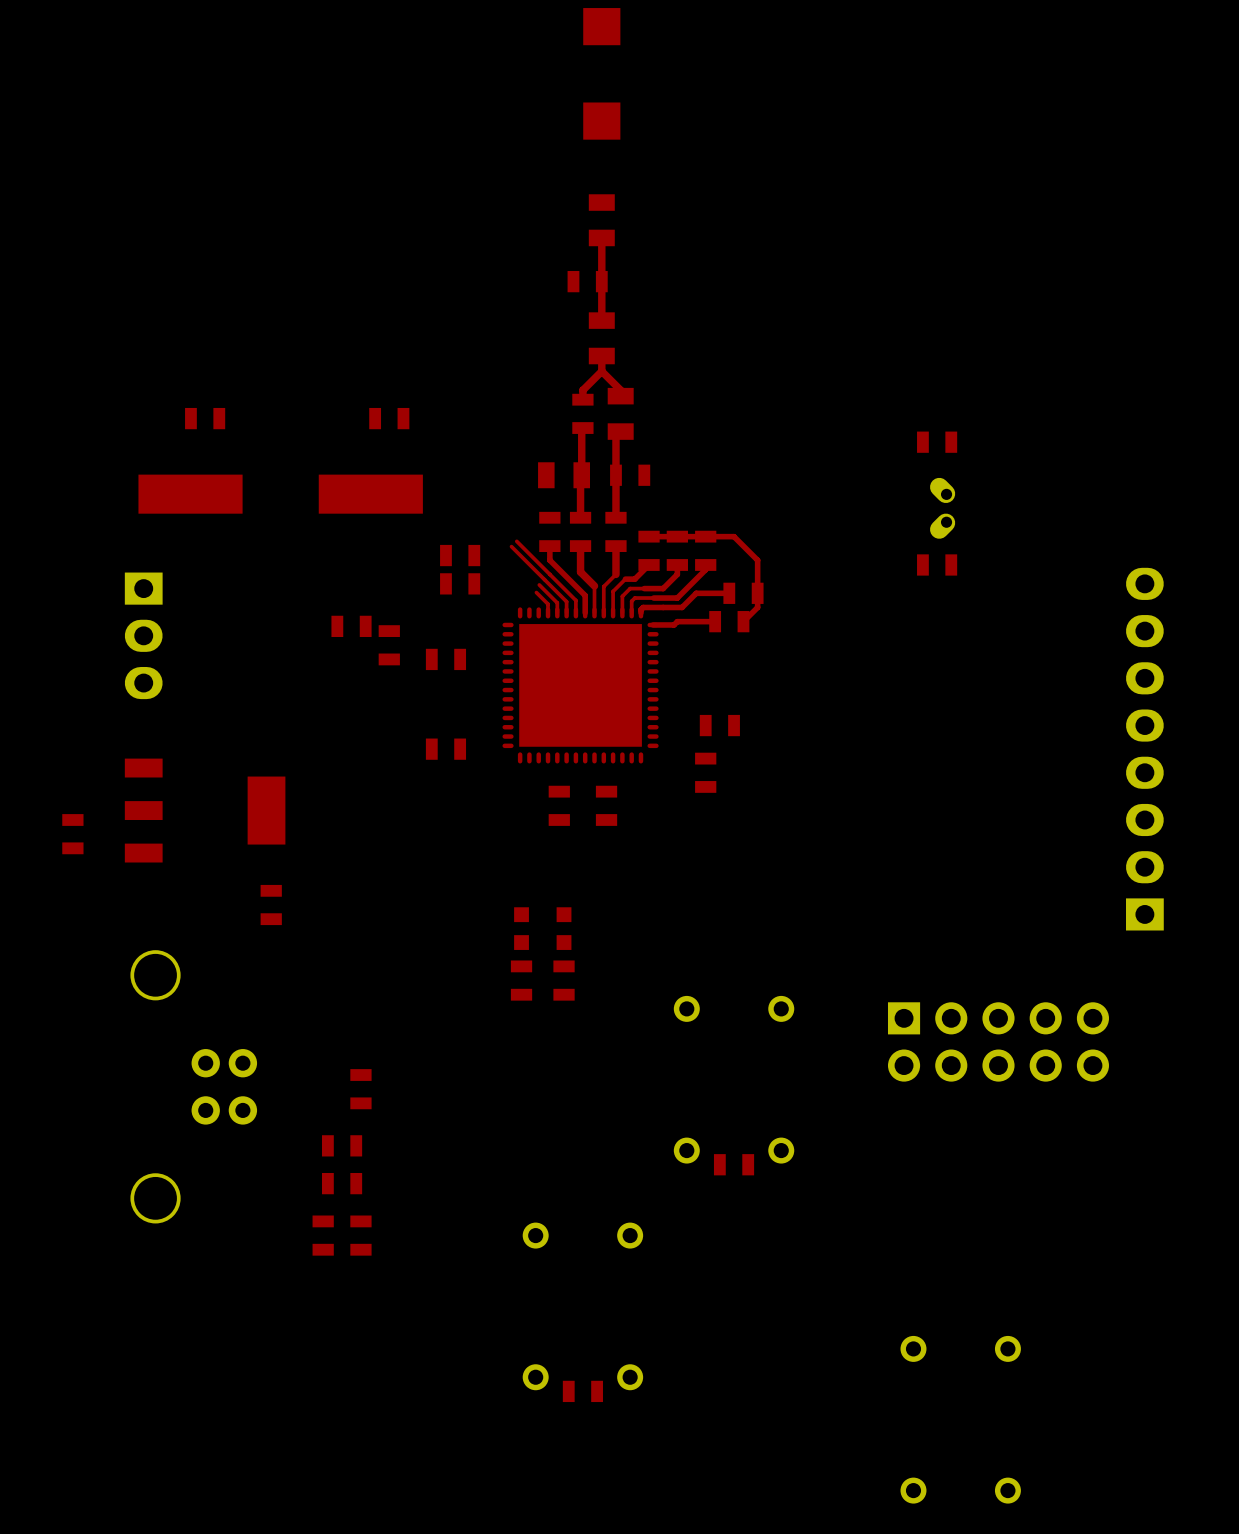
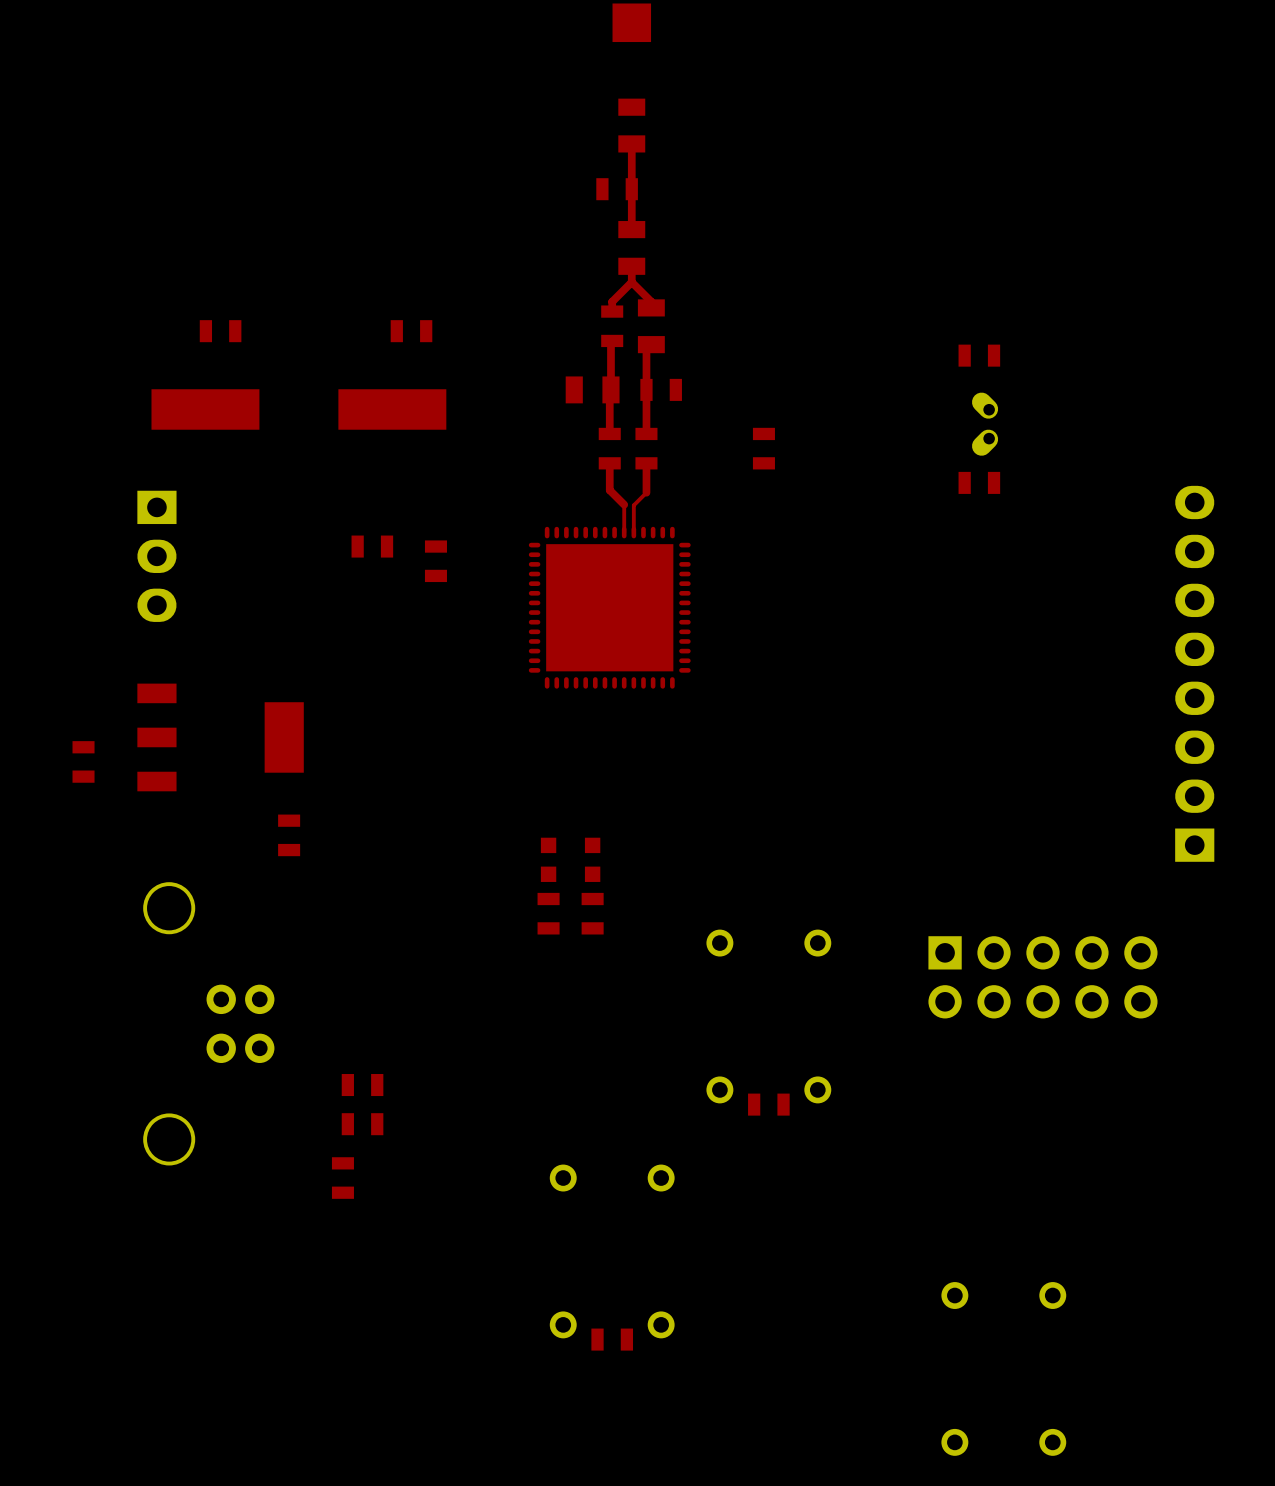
part: (549, 531) -> none
part: none -> (763, 448)
top track: (649, 536) (734, 536) (757, 560) (757, 607) (743, 621) -> none
top track: (516, 541) (575, 600) (575, 612) -> none
top track: (511, 546) (566, 601) (566, 612) -> none
top track: (549, 546) (549, 560) (585, 595) (585, 612) -> none
part: (649, 550) -> none
part: (677, 550) -> none
part: (705, 550) -> none
part: (460, 555) -> none
top track: (649, 564) (634, 579) (625, 579) (613, 591) (613, 612) -> none
top track: (677, 564) (677, 574) (663, 588) (630, 588) (622, 596) (622, 612) -> none
top track: (705, 564) (705, 569) (677, 598) (634, 598) (631, 601) (631, 612) -> none
part: (460, 583) -> none
top track: (539, 584) (557, 602) (557, 612) -> none
top track: (536, 592) (548, 604) (548, 612) -> none
top track: (729, 593) (696, 593) (682, 607) (643, 607) (640, 612) -> none
part: (743, 593) -> none
top track: (715, 621) (677, 621) (674, 624) (653, 624) -> none
part: (729, 621) -> none
part: none -> (435, 561)
part: (389, 645) -> none
part: (445, 659) -> none
part: (719, 725) -> none
part: (445, 749) -> none
part: (705, 772) -> none
part: (559, 805) -> none
part: (606, 805) -> none
part: (360, 1089) -> none
part: (360, 1235) -> none

